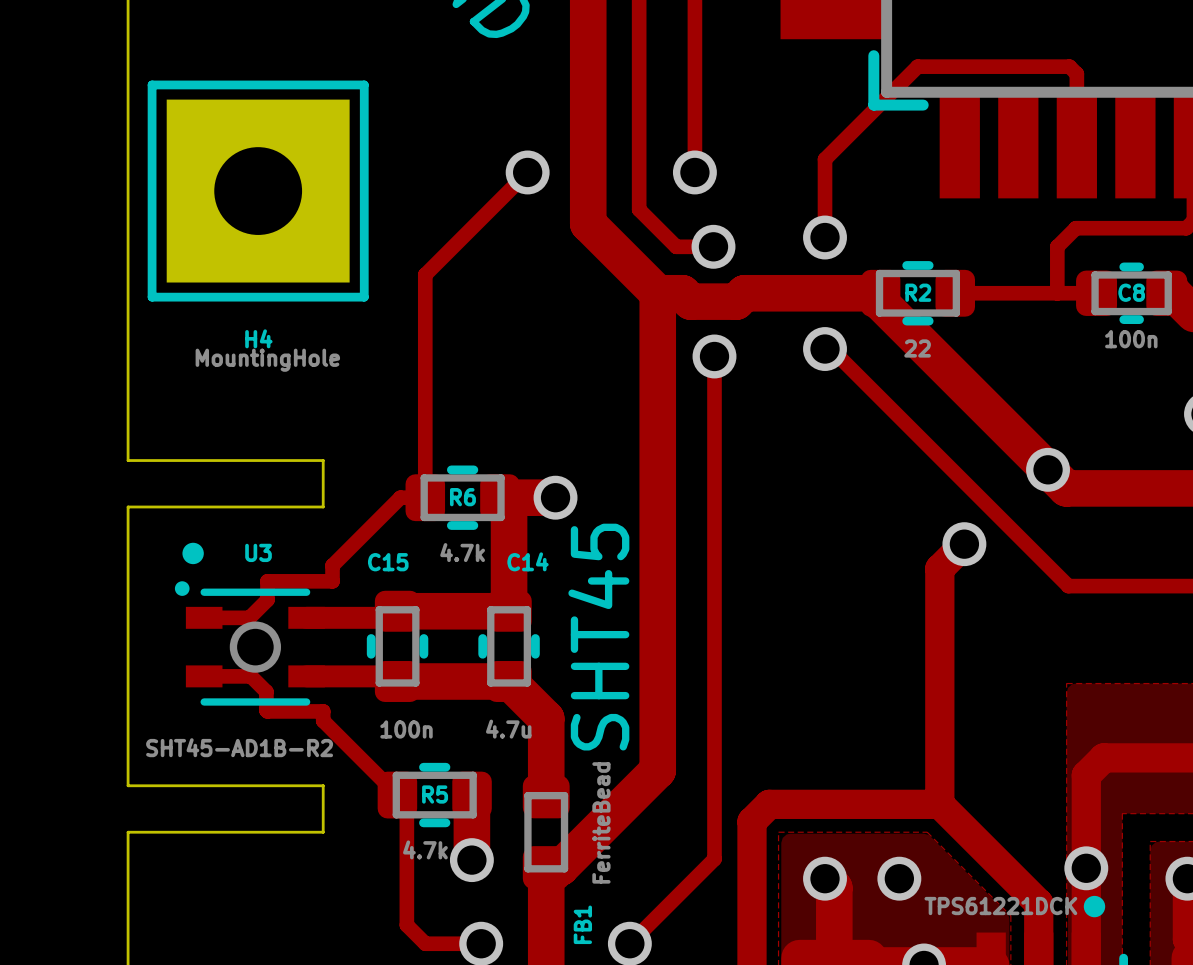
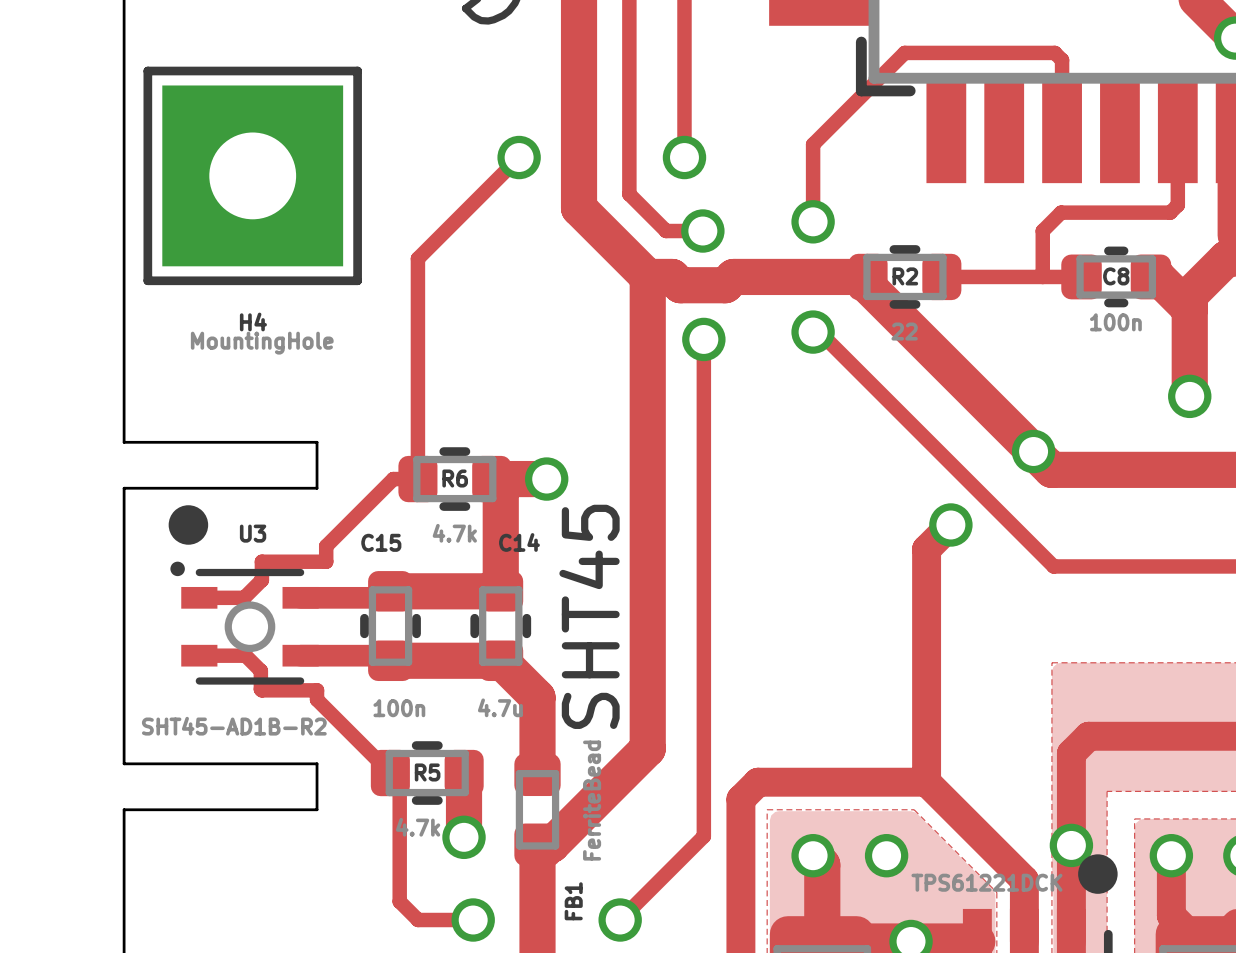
drawing shape: [182, 542, 204, 565] -> [168, 505, 209, 545]
drawing shape: [1083, 895, 1106, 918] -> [1078, 854, 1118, 894]

